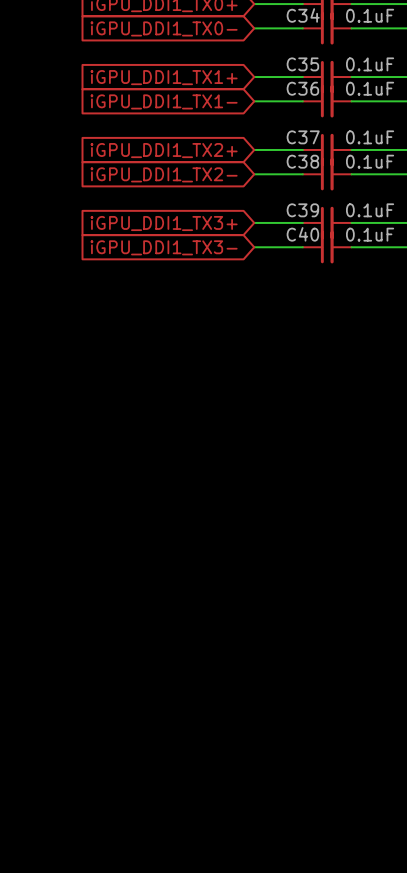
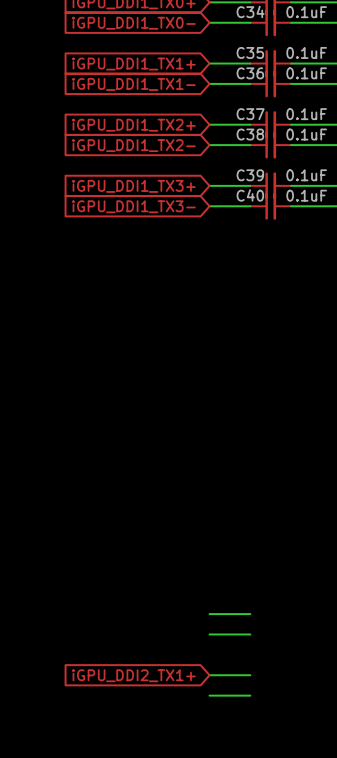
wire: none -> (209, 614) (250, 614)
wire: none -> (209, 634) (250, 634)
wire: none -> (209, 675) (250, 675)
global label: none -> iGPU_DDI2_TX1+ (133, 675)
wire: none -> (209, 695) (250, 695)

